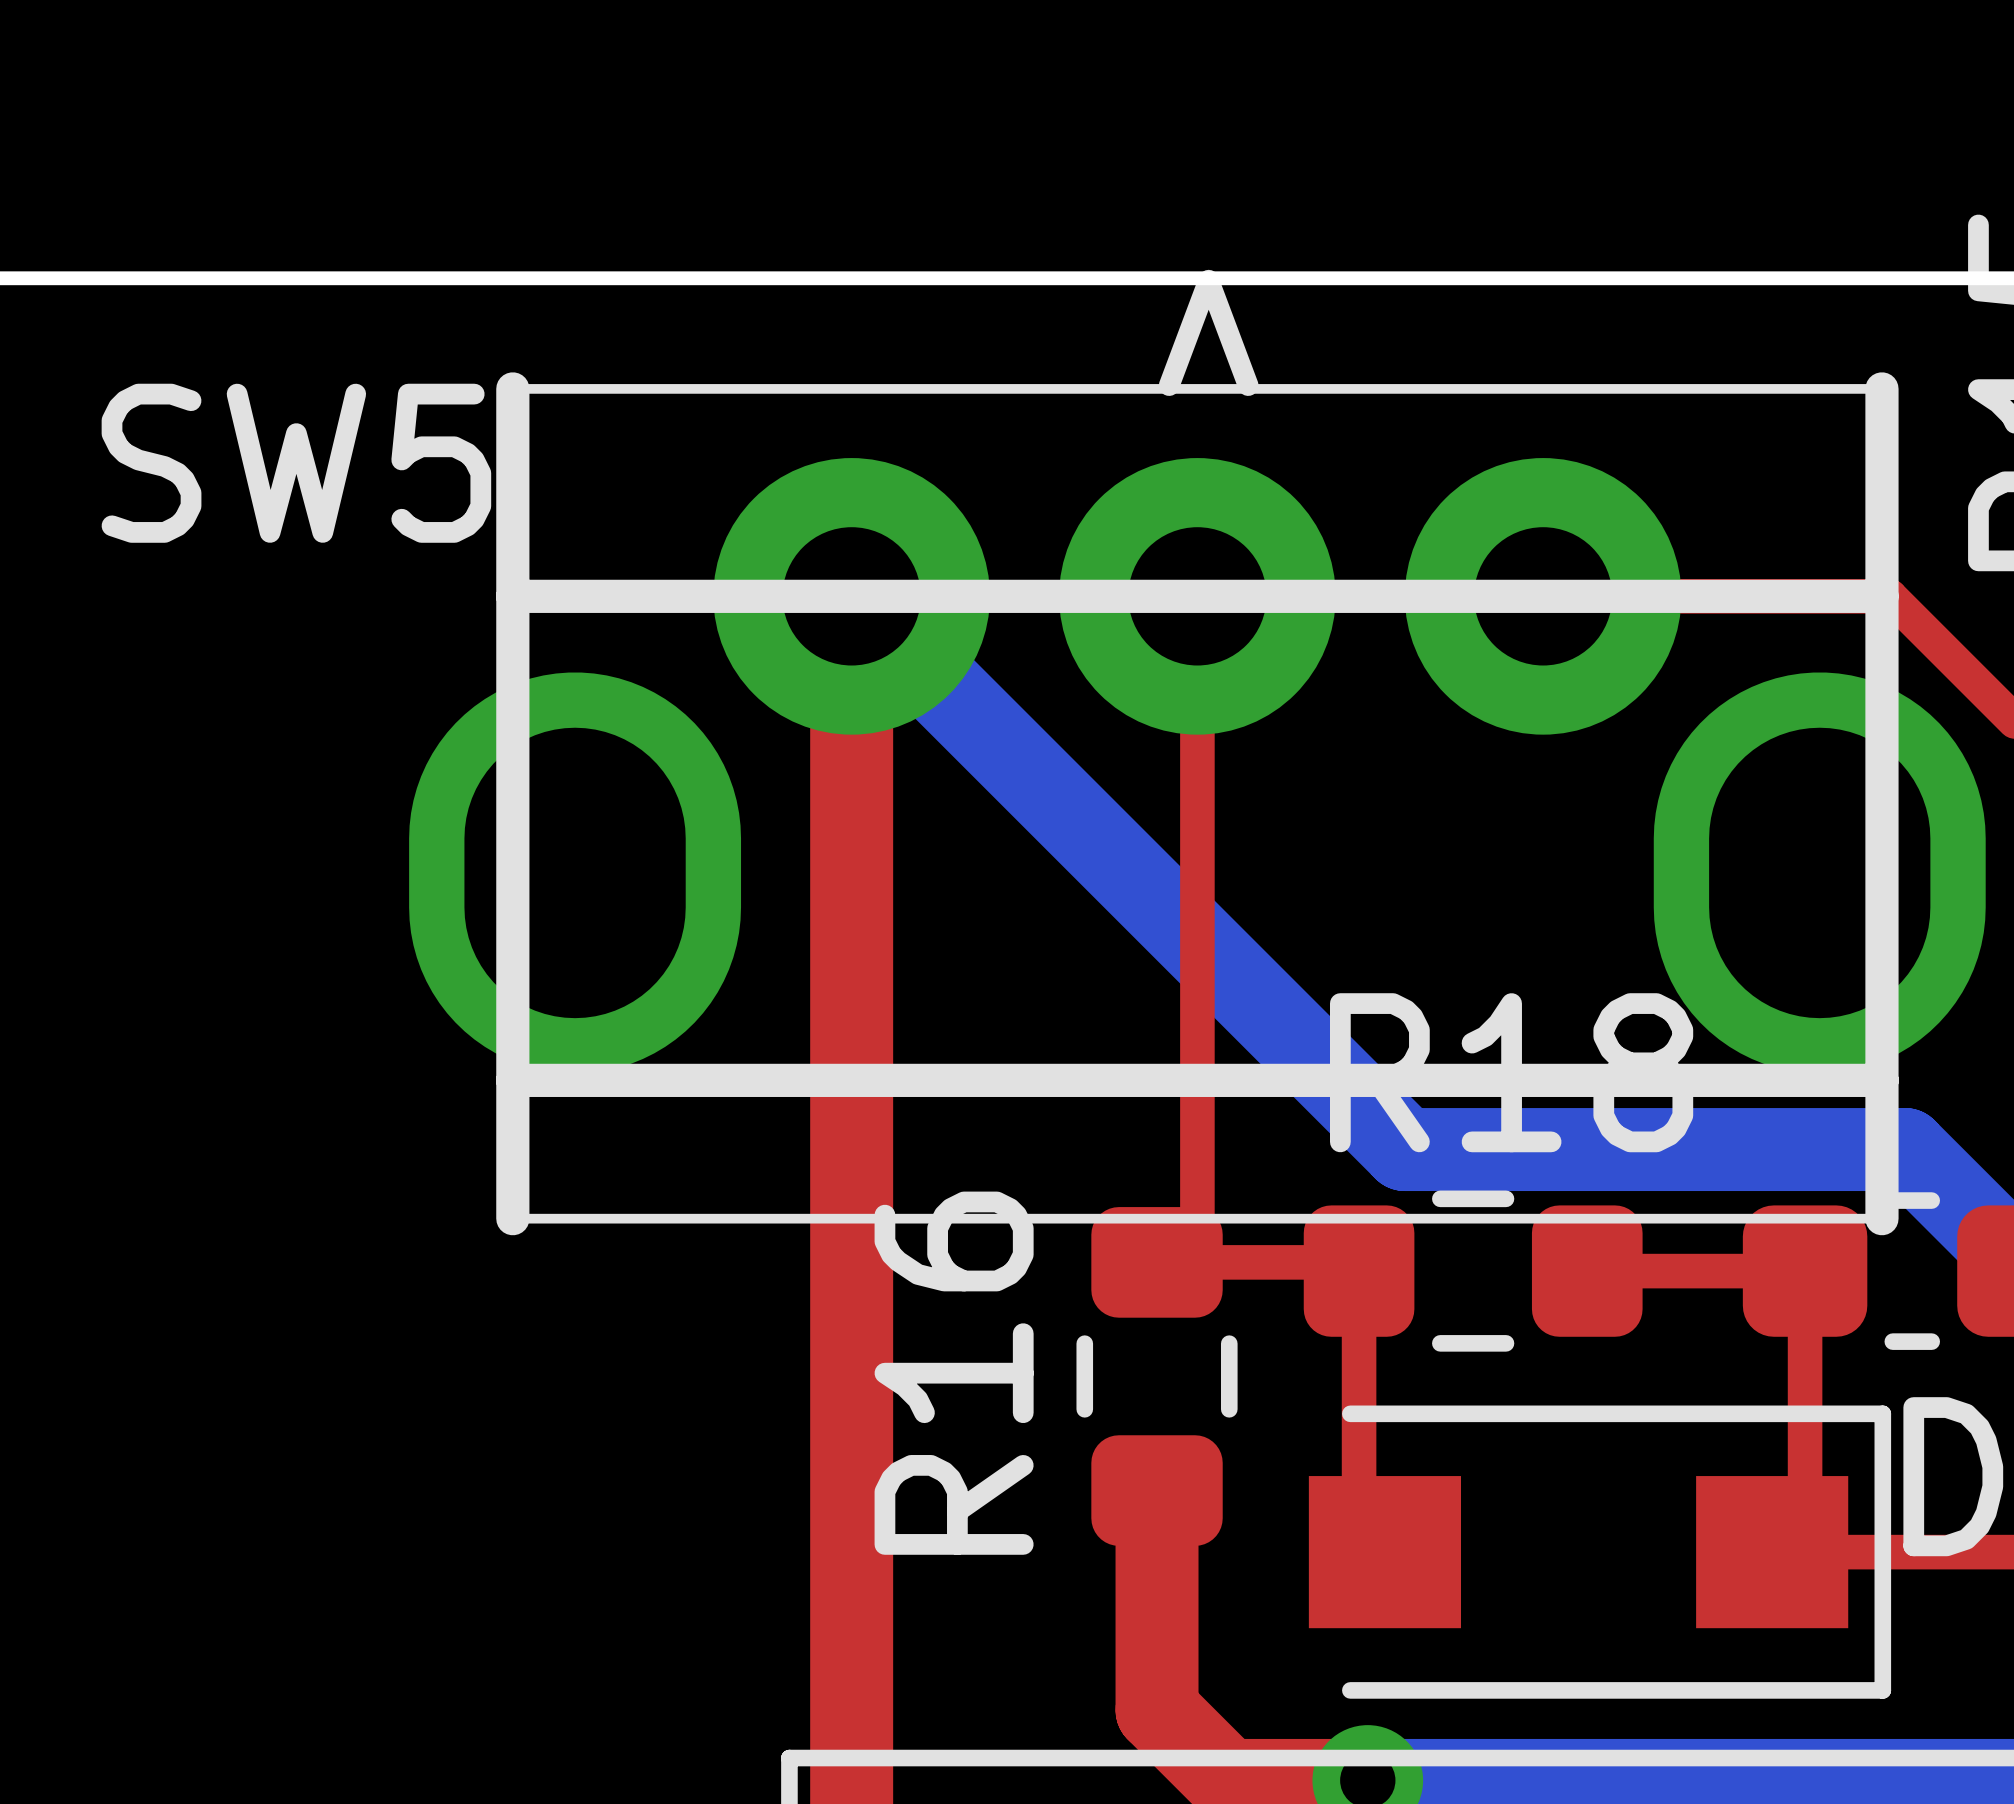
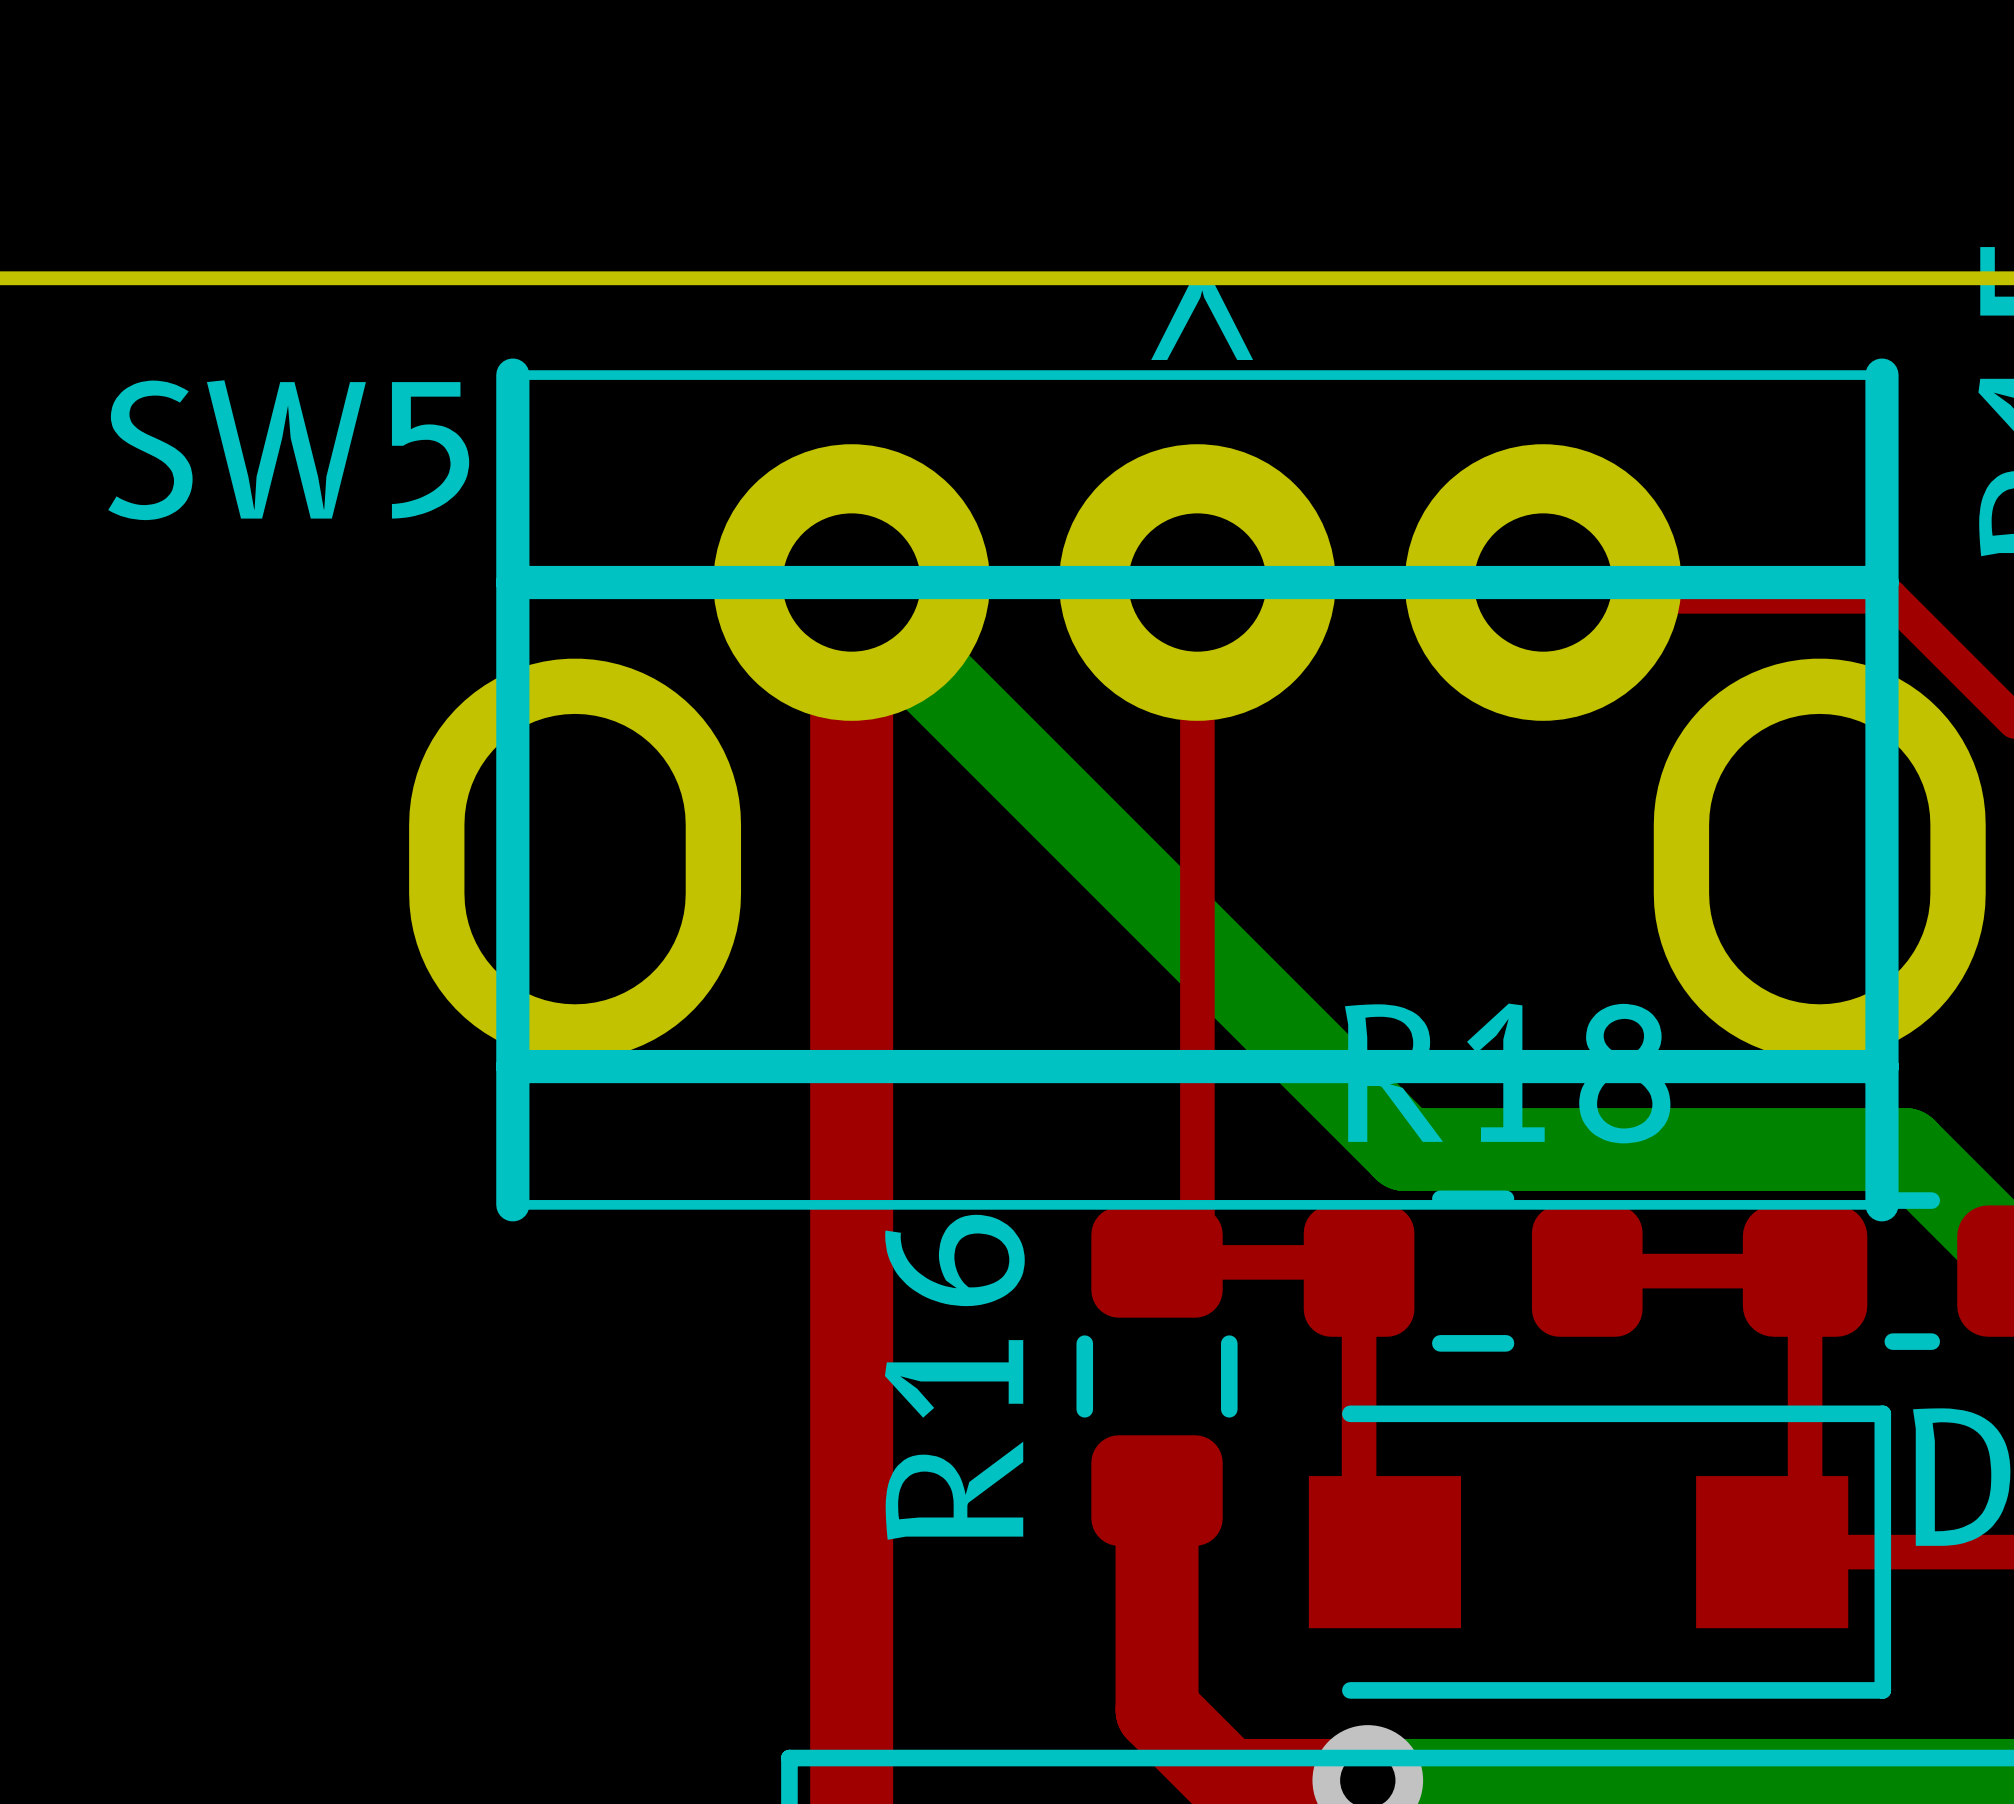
SW5 position: (1197, 803) -> (1197, 789)

